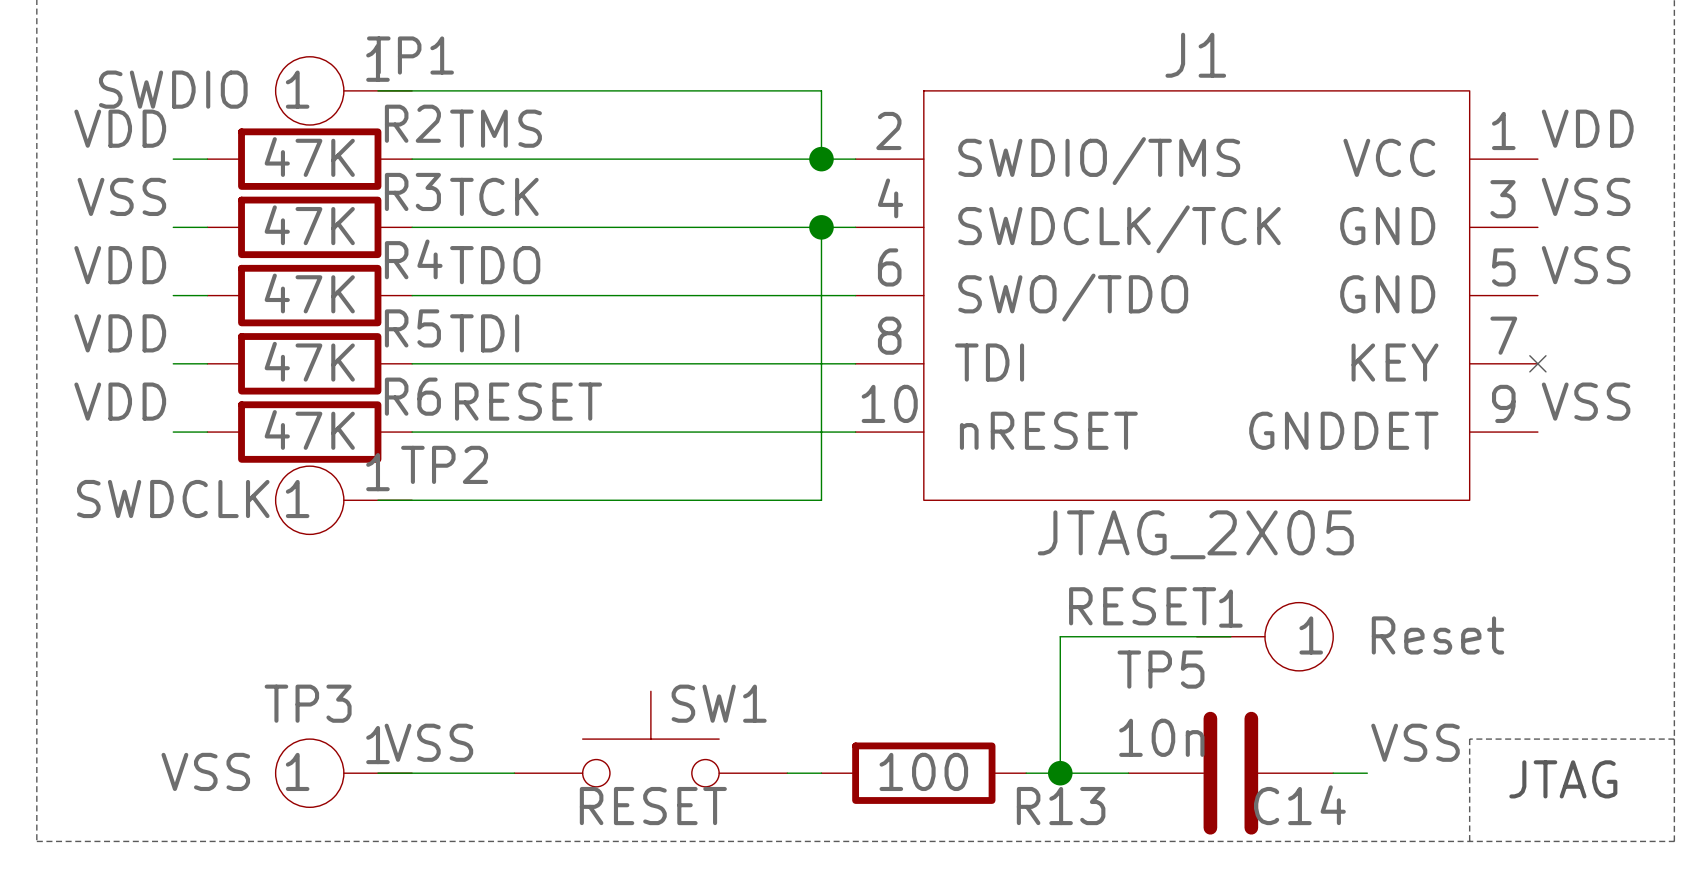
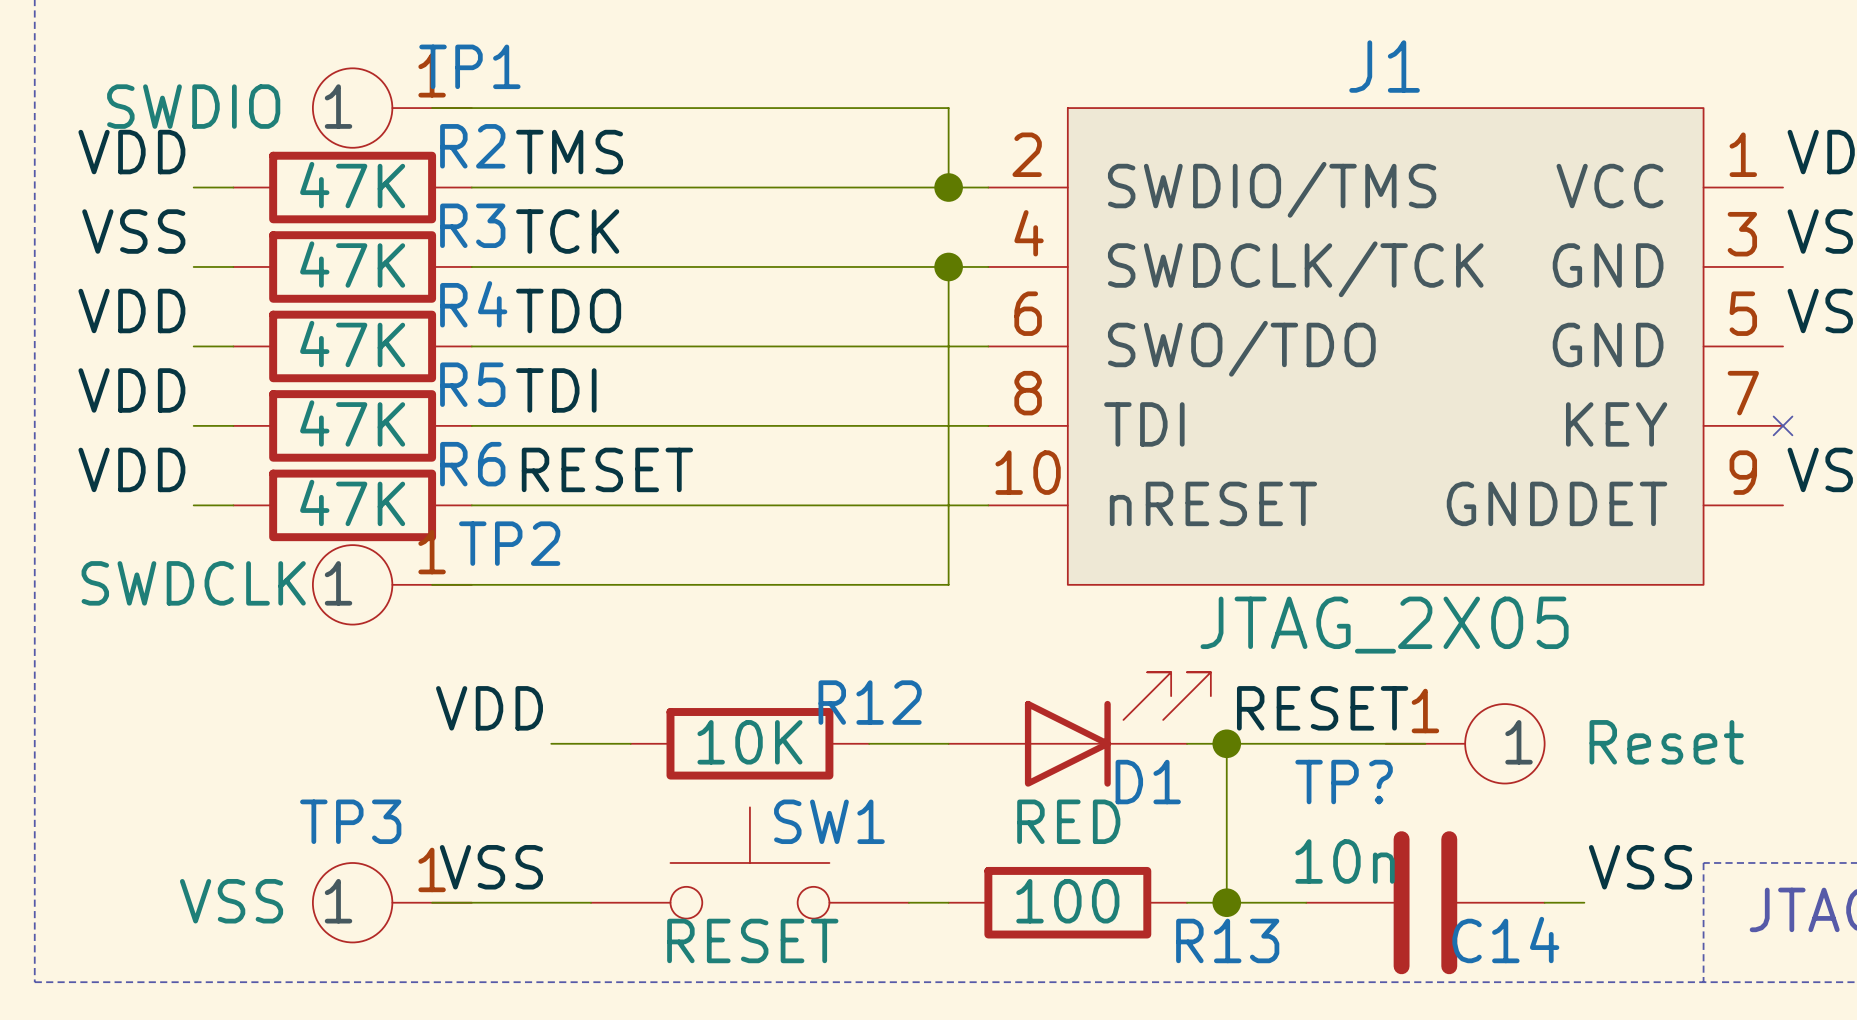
label: none -> VDD (489, 708)
D1: none -> RED (1079, 729)
wire: none -> (551, 743) (630, 743)
R12: none -> 10K (749, 743)
wire: none -> (869, 743) (948, 743)
wire: none -> (1187, 743) (1226, 743)
junction: none -> (1226, 743)
TP5 name: TP5 (1161, 669) -> TP? (1344, 782)

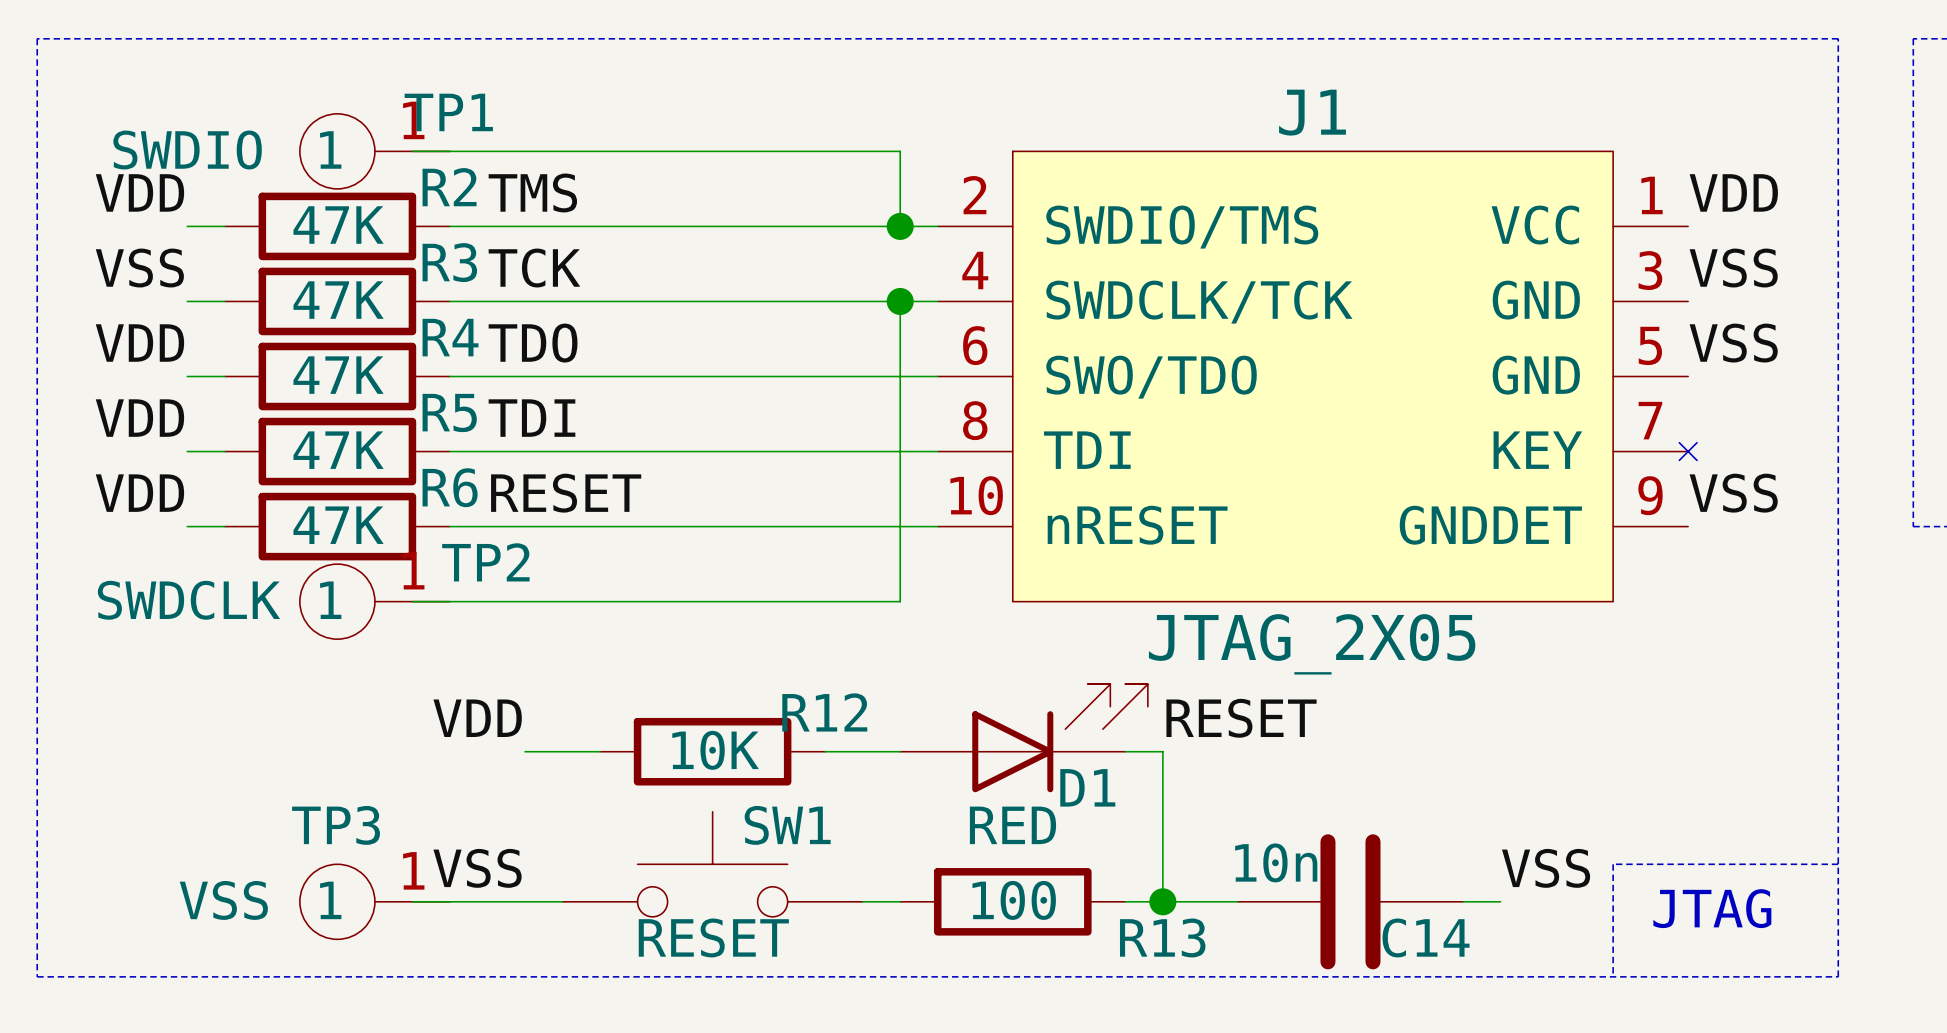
wire: (1226, 743) (1425, 743) -> none
junction: (1226, 743) -> none
TP?: Reset (1465, 743) -> none

